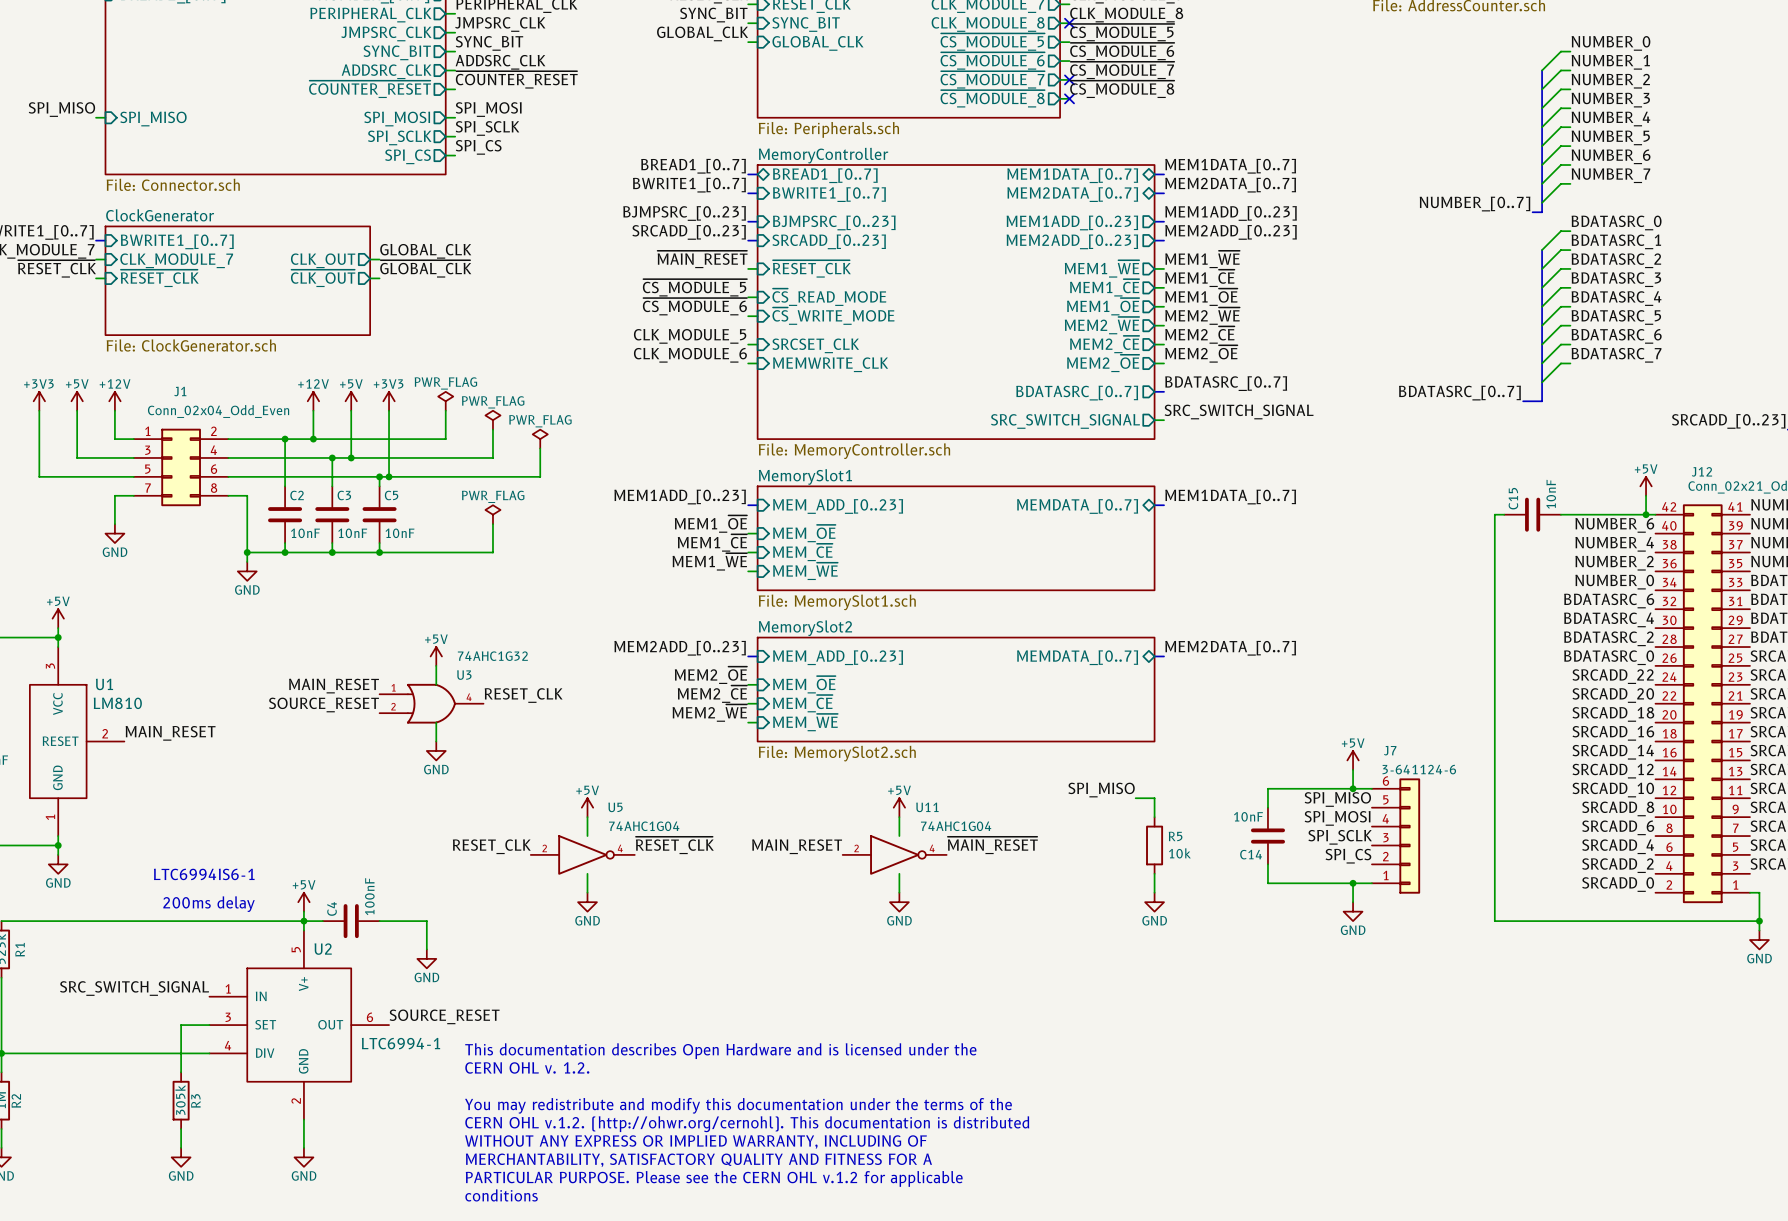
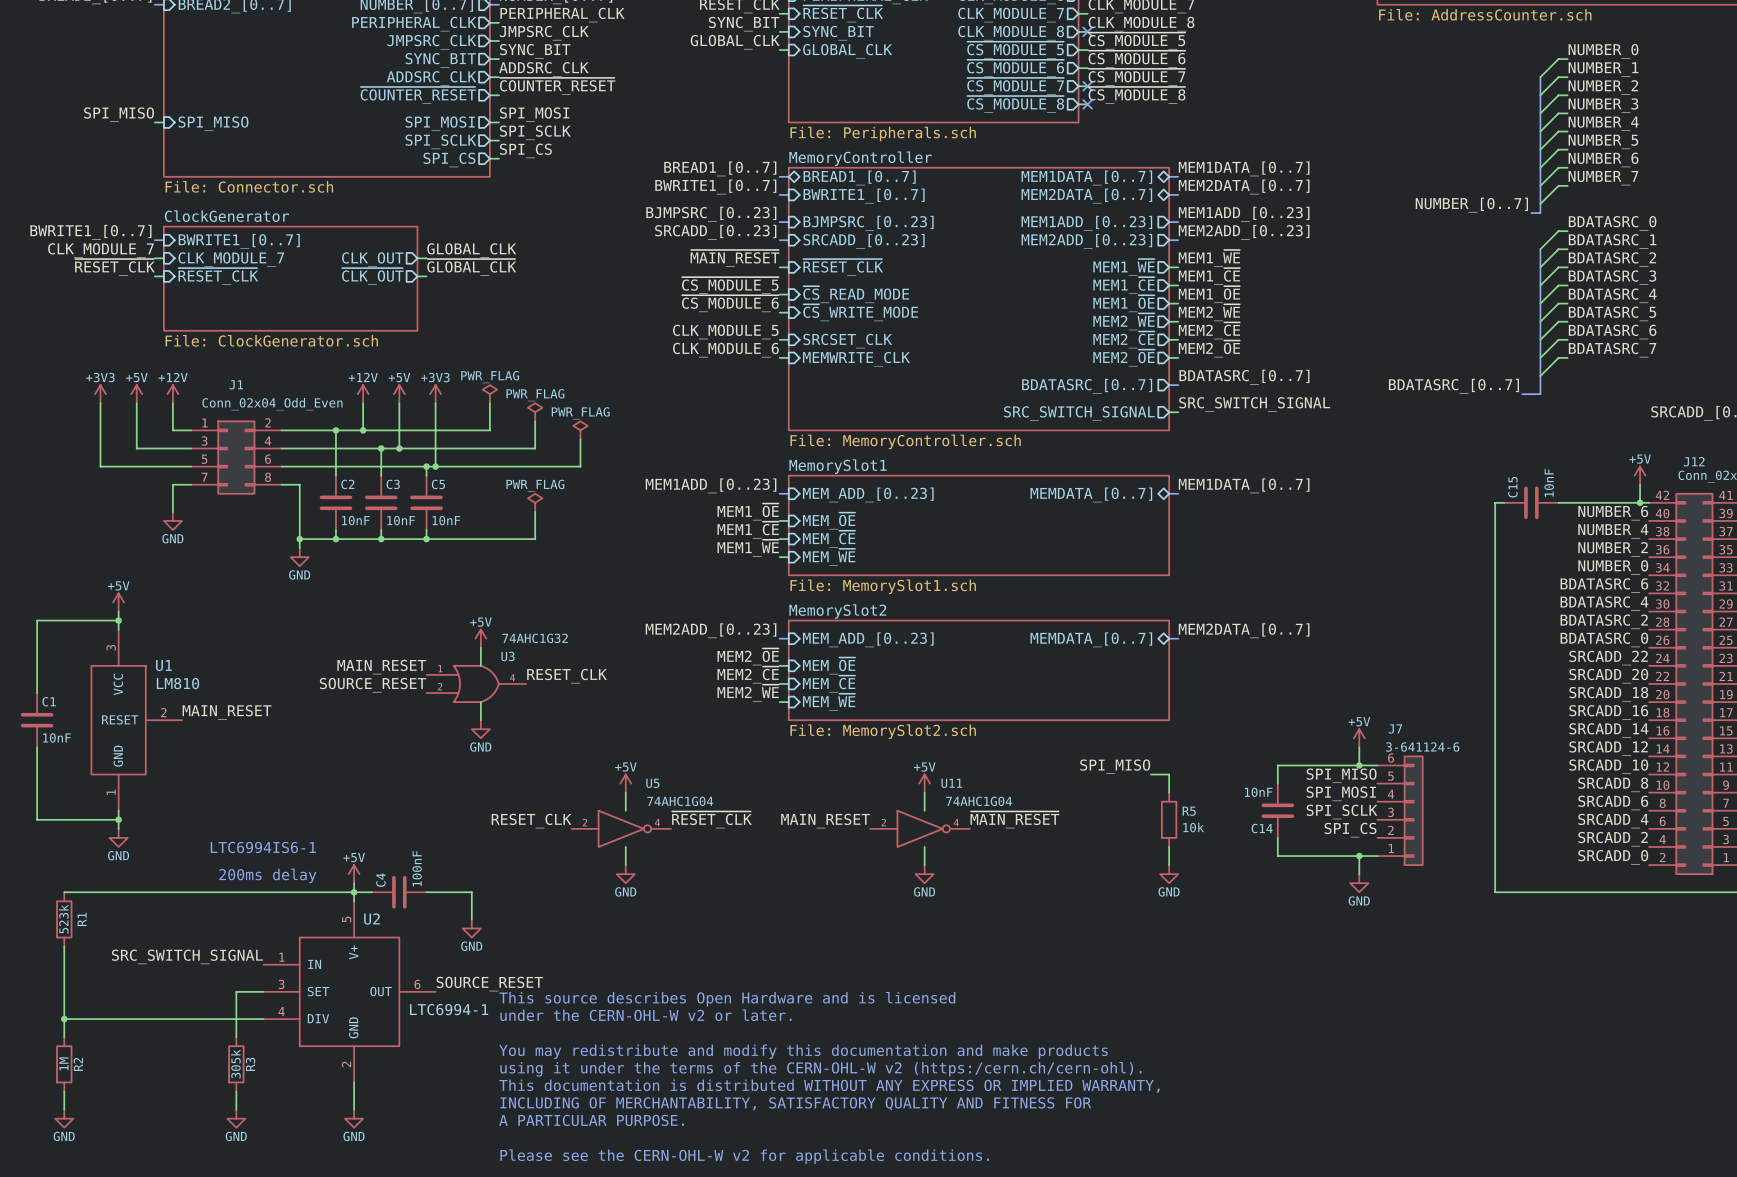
text: none -> under the CERN-OHL-W v2 or later. (645, 1015)
text: This documentation describes Open Hardware and is licensed under the (720, 1051) -> This source describes Open Hardware and is licensed (727, 999)
text: CERN OHL v. 1.2. (527, 1067) -> none
text: none -> using it under the terms of the CERN-OHL-W v2 (https:/cern.ch/cern-ohl). (820, 1069)
text: You may redistribute and modify this documentation under the terms of the (738, 1105) -> You may redistribute and modify this documentation and make products (803, 1051)
text: CERN OHL v.1.2. (http://ohwr.org/cernohl). This documentation is distributed (747, 1124) -> none
text: WITHOUT ANY EXPRESS OR IMPLIED WARRANTY, INCLUDING OF (695, 1142) -> This documentation is distributed WITHOUT ANY EXPRESS OR IMPLIED WARRANTY, (829, 1086)
text: none -> A PARTICULAR PURPOSE. (591, 1120)
text: MERCHANTABILITY, SATISFACTORY QUALITY AND FITNESS FOR A (698, 1160) -> INCLUDING OF MERCHANTABILITY, SATISFACTORY QUALITY AND FITNESS FOR (795, 1103)
text: PARTICULAR PURPOSE. Please see the CERN OHL v.1.2 for applicable (714, 1178) -> Please see the CERN-OHL-W v2 for applicable conditions. (744, 1156)
text: conditions (501, 1195) -> none

